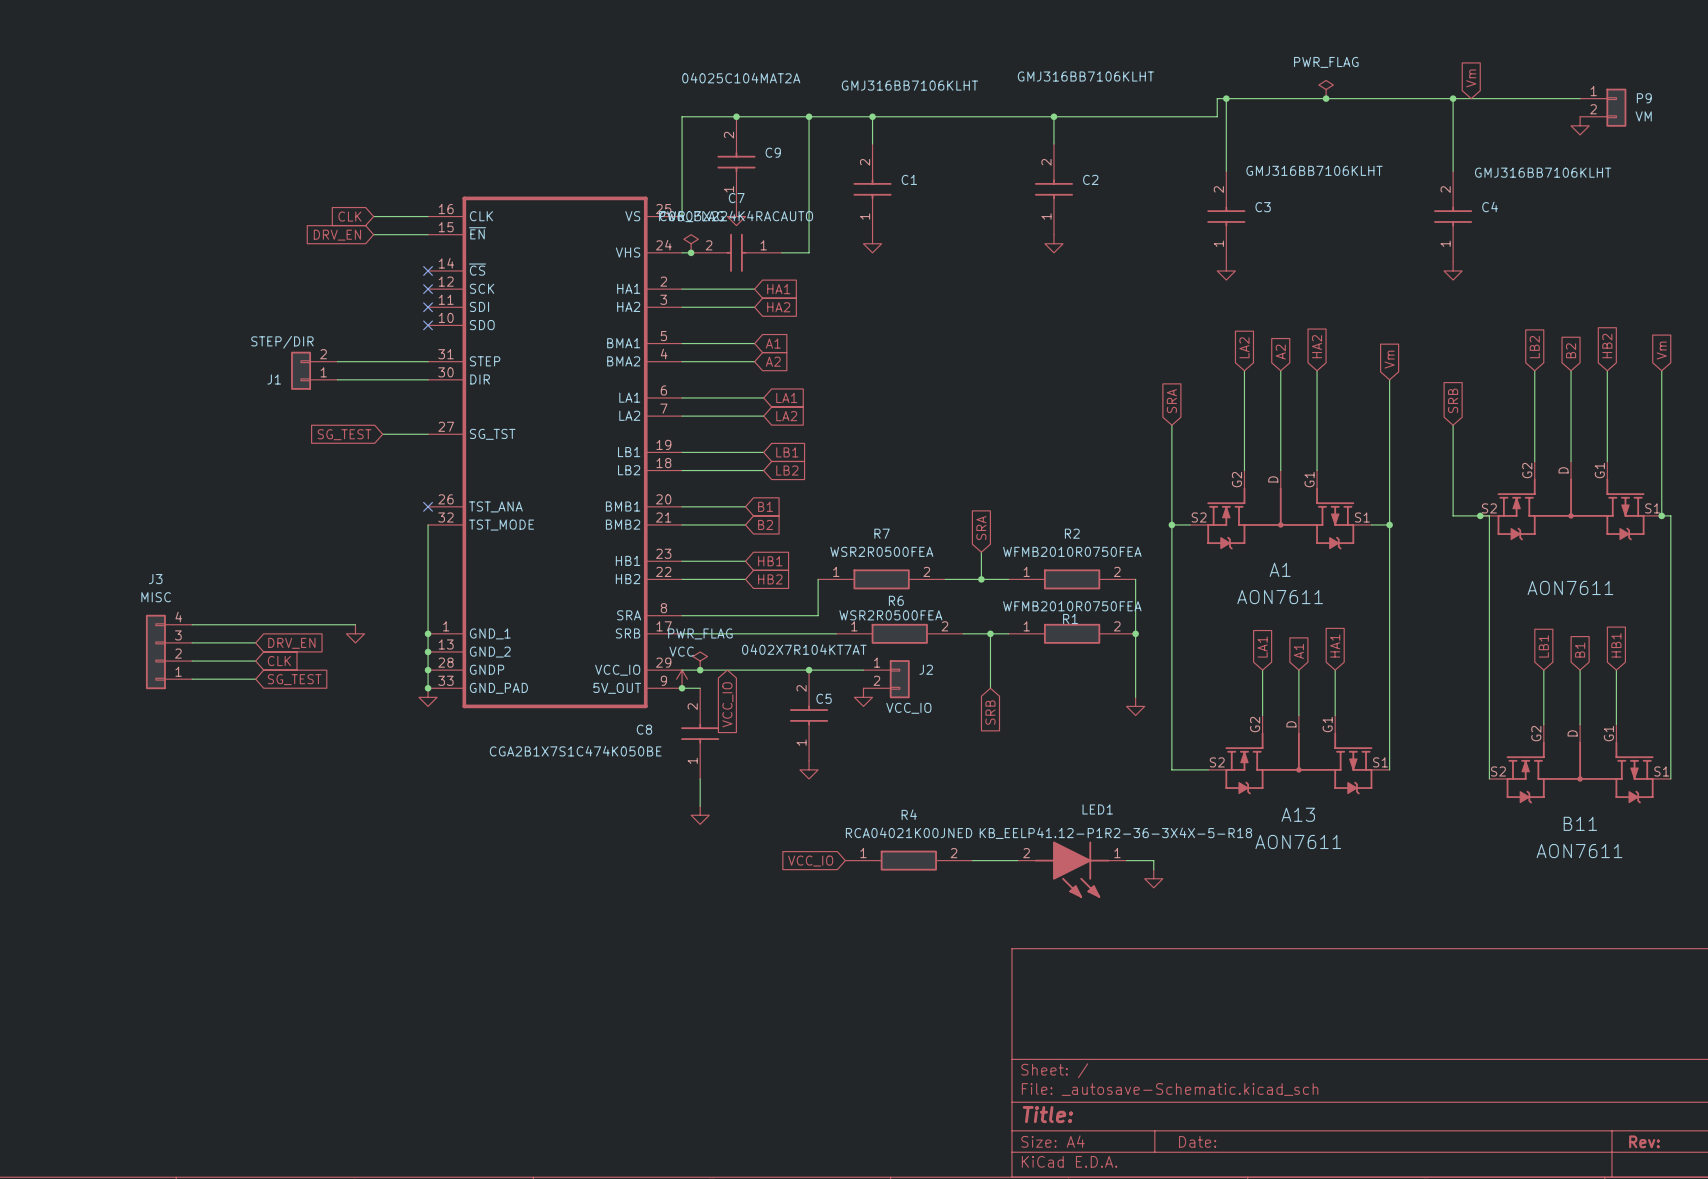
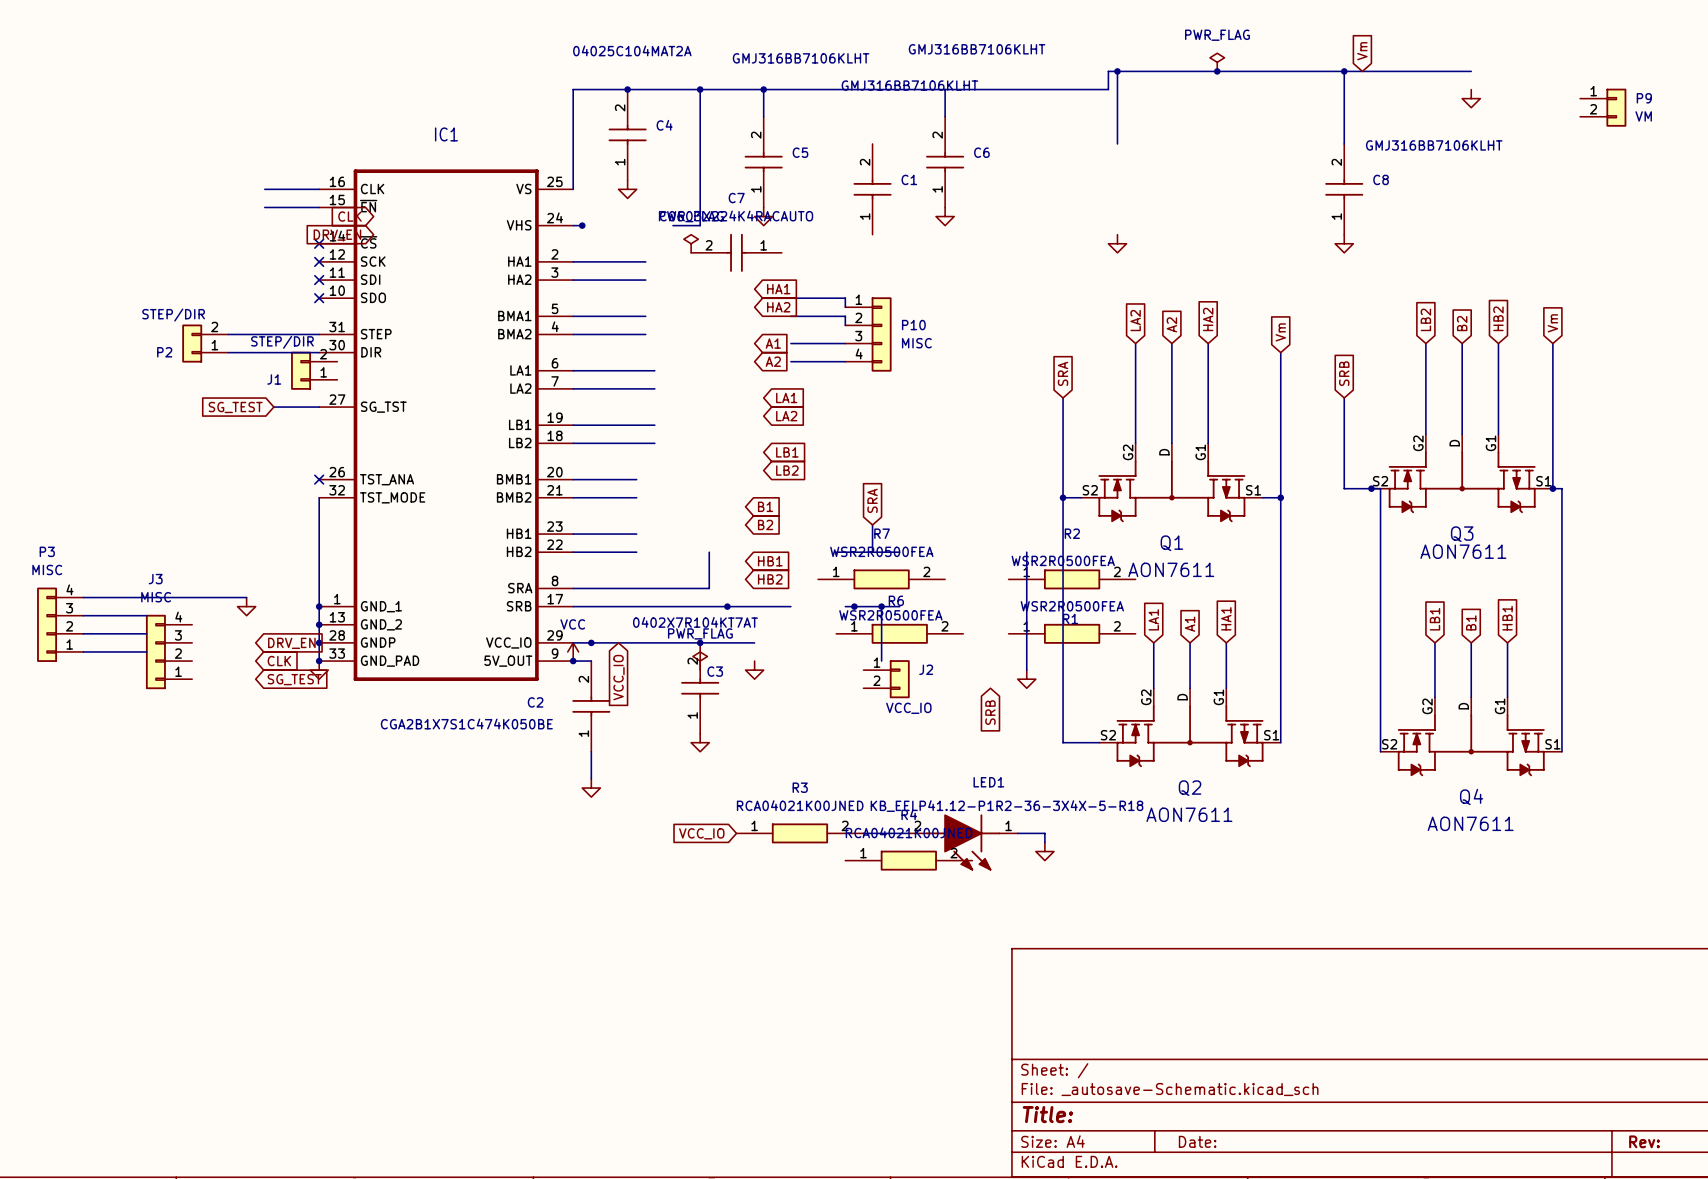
junction: none -> (1117, 71)
C2 value: GMJ316BB7106KLHT (1085, 76) -> CGA2B1X7S1C474K050BE (466, 723)
global label position: Vm (1471, 78) -> Vm (1362, 51)
junction: none -> (627, 89)
junction: none -> (700, 89)
junction: none -> (763, 89)
power symbol position: PWR_FLAG (1326, 89) -> PWR_FLAG (1217, 62)
wire: (1226, 98) (1226, 171) -> (1117, 71) (1117, 143)
junction position: (1226, 98) -> (1217, 71)
junction position: (1326, 98) -> (1344, 71)
wire: (1453, 98) (1453, 171) -> (1344, 71) (1344, 143)
junction: (1453, 98) -> none
power symbol: none -> (1471, 98)
wire: (1580, 98) (1217, 98) (1217, 116) (682, 116) (682, 216) -> (1471, 71) (1108, 71) (1108, 89) (573, 89) (573, 189)
junction: (736, 116) -> none
wire: (809, 116) (809, 252) (781, 252) -> (700, 89) (700, 225) (672, 225)
junction: (809, 116) -> none
wire: (872, 116) (872, 143) -> (763, 89) (763, 116)
junction: (872, 116) -> none
wire: (1053, 116) (1053, 143) -> (945, 89) (945, 116)
junction: (1053, 116) -> none
power symbol: (1580, 125) -> none
C9: 04025C104MAT2A (736, 162) -> none
C6: none -> GMJ316BB7106KLHT (945, 162)
C3 value: GMJ316BB7106KLHT (1314, 170) -> 0402X7R104KT7AT (695, 622)
C4 value: GMJ316BB7106KLHT (1543, 172) -> 04025C104MAT2A (632, 50)
C2 name position: C2 (1090, 179) -> C2 (535, 702)
power symbol: none -> (627, 189)
C2 position: (1053, 189) -> (591, 706)
C3 name position: C3 (1263, 207) -> C3 (715, 671)
wire: (373, 216) (428, 216) -> (264, 189) (319, 189)
power symbol position: (736, 216) -> (763, 216)
power symbol: none -> (945, 216)
C3 position: (1226, 216) -> (700, 688)
C4 position: (1453, 216) -> (627, 134)
junction: none -> (582, 225)
wire: (373, 234) (428, 234) -> (264, 207) (319, 207)
no-connect mark: none -> (319, 243)
power symbol: (872, 243) -> none
power symbol: (1053, 243) -> none
power symbol: none -> (1117, 243)
power symbol: none -> (1344, 243)
wire: (682, 252) (691, 252) -> (573, 225) (582, 225)
junction: (691, 252) -> none
no-connect mark: none -> (319, 261)
no-connect mark: (428, 270) -> none
power symbol: (1226, 270) -> none
power symbol: (1453, 270) -> none
no-connect mark: none -> (319, 280)
no-connect mark: (428, 289) -> none
wire: (682, 289) (754, 289) -> (573, 261) (645, 261)
no-connect mark: none -> (319, 298)
wire: none -> (790, 298) (845, 298) (845, 307)
no-connect mark: (428, 307) -> none
wire: (682, 307) (754, 307) -> (573, 280) (645, 280)
wire: none -> (790, 316) (845, 316) (845, 325)
global label: none -> Vm (1552, 323)
no-connect mark: (428, 325) -> none
global label: none -> Vm (1280, 332)
P10: none -> MISC (868, 334)
P2: none -> STEP/DIR (205, 343)
wire: (682, 343) (754, 343) -> (573, 316) (645, 316)
wire: none -> (790, 343) (845, 343)
wire: none -> (1171, 343) (1171, 425)
global label position: HA2 (1317, 346) -> HA2 (1208, 319)
global label position: HB2 (1607, 346) -> HB2 (1498, 318)
global label position: LA2 (1244, 347) -> LA2 (1135, 320)
global label position: LB2 (1534, 347) -> LB2 (1425, 319)
global label position: B2 (1571, 350) -> B2 (1462, 323)
global label: Vm (1661, 350) -> none
wire: none -> (1280, 352) (1280, 370)
global label position: A2 (1280, 352) -> A2 (1171, 324)
global label: Vm (1389, 359) -> none
wire: (337, 361) (428, 361) -> (228, 334) (319, 334)
wire: (682, 361) (754, 361) -> (573, 334) (645, 334)
wire: none -> (790, 361) (845, 361)
wire: (1244, 370) (1244, 470) -> (1135, 343) (1135, 443)
wire: (1317, 370) (1317, 470) -> (1208, 343) (1208, 443)
wire: (1534, 370) (1534, 461) -> (1425, 343) (1425, 434)
wire: (1571, 370) (1571, 461) -> (1462, 343) (1462, 434)
wire: (1607, 370) (1607, 461) -> (1498, 343) (1498, 434)
wire: (1661, 370) (1661, 515) (1670, 515) (1670, 778) -> (1552, 343) (1552, 488) (1561, 488) (1561, 751)
global label: none -> SRA (1063, 373)
wire: (337, 379) (428, 379) -> (228, 352) (319, 352)
wire: (1389, 379) (1389, 769) -> none
wire: (682, 397) (763, 397) -> (573, 370) (654, 370)
wire: none -> (1063, 397) (1063, 742) (1099, 742)
global label position: SRB (1453, 400) -> SRB (1344, 373)
global label: SRA (1171, 401) -> none
wire: (682, 416) (763, 416) -> (573, 388) (654, 388)
IC1: none -> (446, 425)
wire: (1453, 425) (1453, 515) (1489, 515) (1489, 778) -> (1344, 397) (1344, 488) (1380, 488) (1380, 751)
global label position: SG_TEST (344, 434) -> SG_TEST (235, 407)
wire: (382, 434) (428, 434) -> (273, 407) (319, 407)
wire: (1171, 443) (1171, 769) (1208, 769) -> none
part: (555, 452) -> none
wire: (682, 452) (763, 452) -> (573, 425) (654, 425)
wire: (682, 470) (763, 470) -> (573, 443) (654, 443)
wire: none -> (1280, 470) (1280, 742)
Q3: none -> AON7611 (1462, 473)
no-connect mark: none -> (319, 479)
Q1: none -> AON7611 (1171, 482)
junction: none -> (1552, 488)
junction: none -> (1063, 497)
junction: none -> (1280, 497)
global label: none -> SRA (872, 500)
part: AON7611 (1571, 500) -> none
no-connect mark: (428, 506) -> none
wire: (682, 506) (745, 506) -> (573, 479) (636, 479)
A1: AON7611 (1280, 510) -> none
junction: (1480, 515) -> none
junction: (1661, 515) -> none
wire: (428, 524) (428, 688) -> (319, 497) (319, 661)
wire: (682, 524) (745, 524) -> (573, 497) (636, 497)
wire: (1171, 524) (1190, 524) -> (1063, 497) (1081, 497)
junction: (1171, 524) -> none
wire: (1371, 524) (1389, 524) -> (1262, 497) (1280, 497)
junction position: (1389, 524) -> (1371, 488)
global label: SRA (981, 528) -> none
R2 value: WFMB2010R0750FEA (1072, 551) -> WSR2R0500FEA (1063, 560)
wire: (981, 552) (981, 579) -> (872, 524) (872, 552)
wire: (682, 561) (745, 561) -> (573, 534) (636, 534)
wire: (682, 579) (745, 579) -> (573, 552) (636, 552)
wire: (818, 579) (818, 615) (682, 615) -> (709, 552) (709, 588) (573, 588)
wire: (945, 579) (1008, 579) -> (836, 552) (899, 552)
junction: (981, 579) -> none
wire: (1135, 579) (1135, 697) -> (1026, 552) (1026, 670)
power symbol: none -> (246, 606)
junction: none -> (319, 606)
wire: none -> (573, 606) (790, 606)
junction: none -> (727, 606)
wire: none -> (845, 606) (899, 606)
junction: none -> (854, 606)
junction: none -> (881, 606)
R1 value: WFMB2010R0750FEA (1072, 606) -> WSR2R0500FEA (1072, 606)
P3: none -> MISC (60, 624)
wire: (192, 624) (355, 624) -> (83, 597) (246, 597)
junction: none -> (319, 624)
power symbol position: (355, 633) -> (319, 670)
junction: (428, 633) -> none
wire: (682, 633) (836, 633) -> none
wire: (963, 633) (1008, 633) -> none
wire: (990, 633) (990, 688) -> (881, 606) (881, 661)
junction: (990, 633) -> none
junction: (1135, 633) -> none
wire: (192, 642) (255, 642) -> (83, 615) (146, 615)
junction: none -> (319, 642)
junction: none -> (591, 642)
junction: none -> (700, 642)
global label position: HB1 (1616, 645) -> HB1 (1507, 618)
global label position: HA1 (1335, 646) -> HA1 (1226, 618)
global label position: LB1 (1543, 646) -> LB1 (1434, 619)
global label position: LA1 (1262, 647) -> LA1 (1153, 619)
C5 value: 0402X7R104KT7AT (804, 649) -> GMJ316BB7106KLHT (801, 58)
global label position: B1 (1580, 650) -> B1 (1471, 622)
junction: (428, 651) -> none
global label position: A1 (1298, 651) -> A1 (1190, 624)
wire: (192, 661) (255, 661) -> (83, 633) (146, 633)
junction: none -> (319, 661)
junction: none -> (573, 661)
junction: (428, 670) -> none
wire: (682, 670) (863, 670) -> (573, 642) (754, 642)
junction: (700, 670) -> none
power symbol: none -> (754, 670)
junction: (809, 670) -> none
wire: (1262, 670) (1262, 715) -> (1153, 642) (1153, 688)
wire: (1298, 670) (1298, 715) -> (1190, 642) (1190, 688)
wire: (1335, 670) (1335, 715) -> (1226, 642) (1226, 688)
wire: (1543, 670) (1543, 724) -> (1434, 642) (1434, 697)
wire: (1580, 670) (1580, 724) -> (1471, 642) (1471, 697)
wire: (1616, 670) (1616, 724) -> (1507, 642) (1507, 697)
global label: none -> VCC_IO (618, 677)
wire: (192, 679) (255, 679) -> (83, 651) (146, 651)
power symbol position: VCC (682, 679) -> VCC (573, 651)
power symbol: none -> (1026, 679)
junction: (428, 688) -> none
wire: (682, 688) (700, 688) -> (573, 661) (591, 661)
junction: (682, 688) -> none
power symbol: (428, 697) -> none
power symbol: (863, 697) -> none
C5 name position: C5 (824, 698) -> C5 (800, 152)
global label: VCC_IO (727, 704) -> none
power symbol: (1135, 706) -> none
C5 position: (809, 715) -> (763, 162)
Q2: none -> AON7611 (1190, 727)
C8 name position: C8 (644, 729) -> C8 (1381, 179)
C8 position: (700, 733) -> (1344, 189)
Q4: none -> AON7611 (1471, 736)
power symbol: none -> (700, 742)
C8 value: CGA2B1X7S1C474K050BE (575, 751) -> GMJ316BB7106KLHT (1434, 145)
A13: AON7611 (1298, 754) -> none
B11: AON7611 (1580, 764) -> none
power symbol: (809, 769) -> none
wire: (700, 778) (700, 806) -> (591, 751) (591, 778)
power symbol: none -> (591, 788)
power symbol: (700, 815) -> none
global label: none -> VCC_IO (701, 833)
R3: none -> RCA04021K00JNED (799, 833)
power symbol: none -> (1044, 851)
wire: (972, 860) (1017, 860) -> (863, 833) (908, 833)
wire: (1126, 860) (1153, 860) (1153, 869) -> (1017, 833) (1044, 833) (1044, 842)
global label: VCC_IO (810, 861) -> none
LED1 position: (1072, 869) -> (963, 842)
power symbol: (1153, 878) -> none

